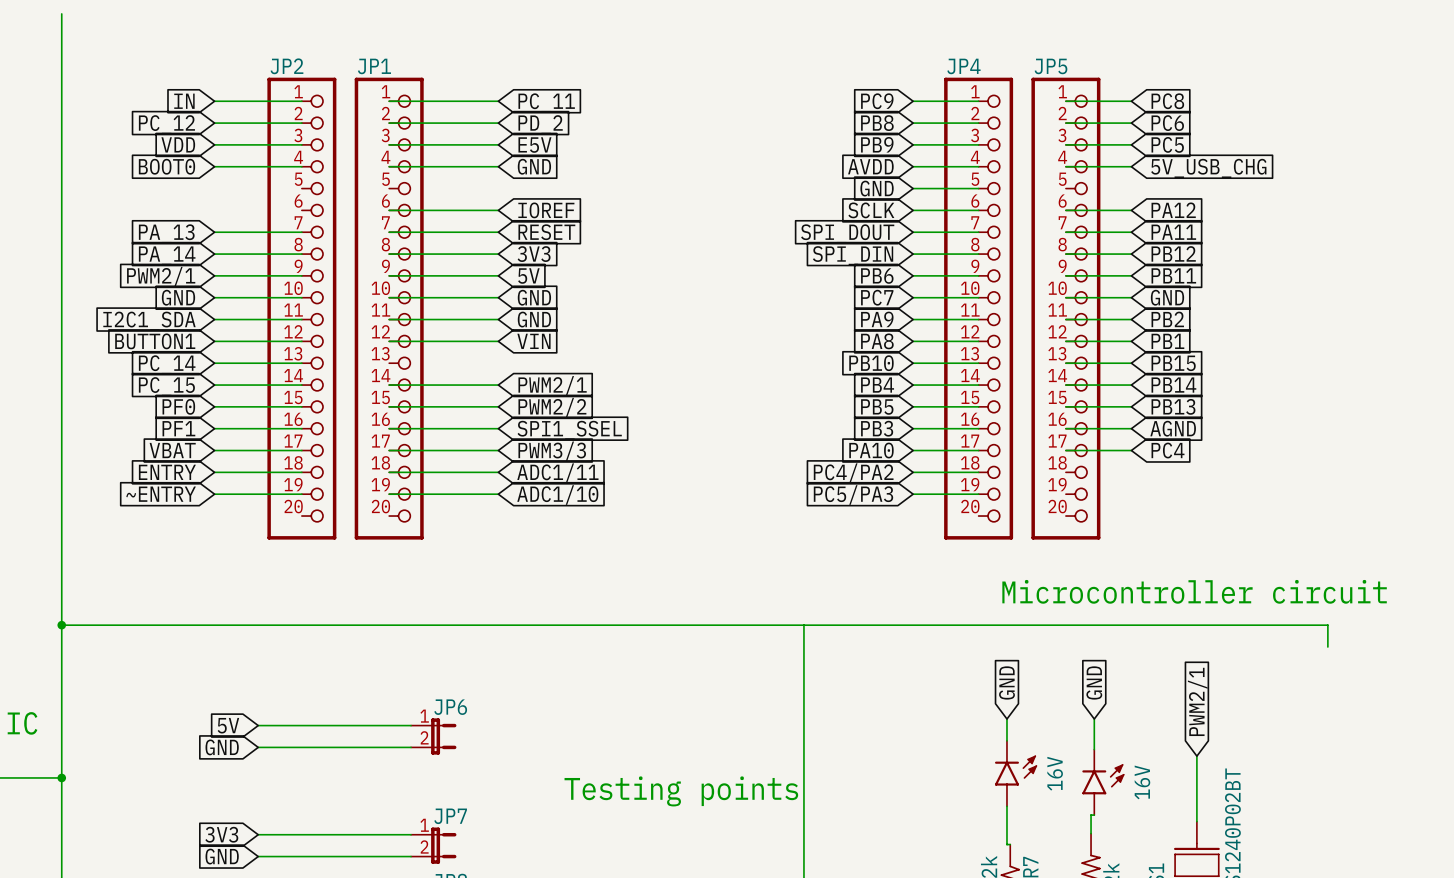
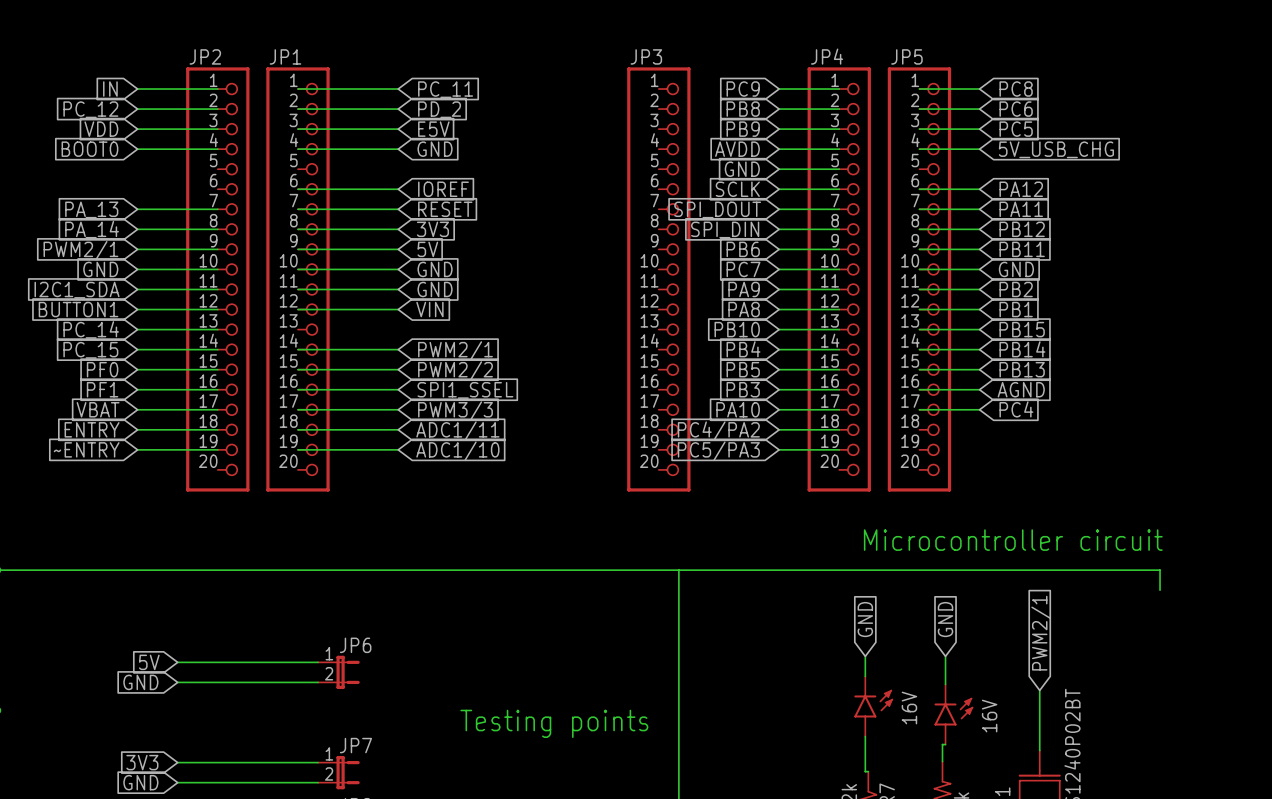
JP3: none -> (658, 279)

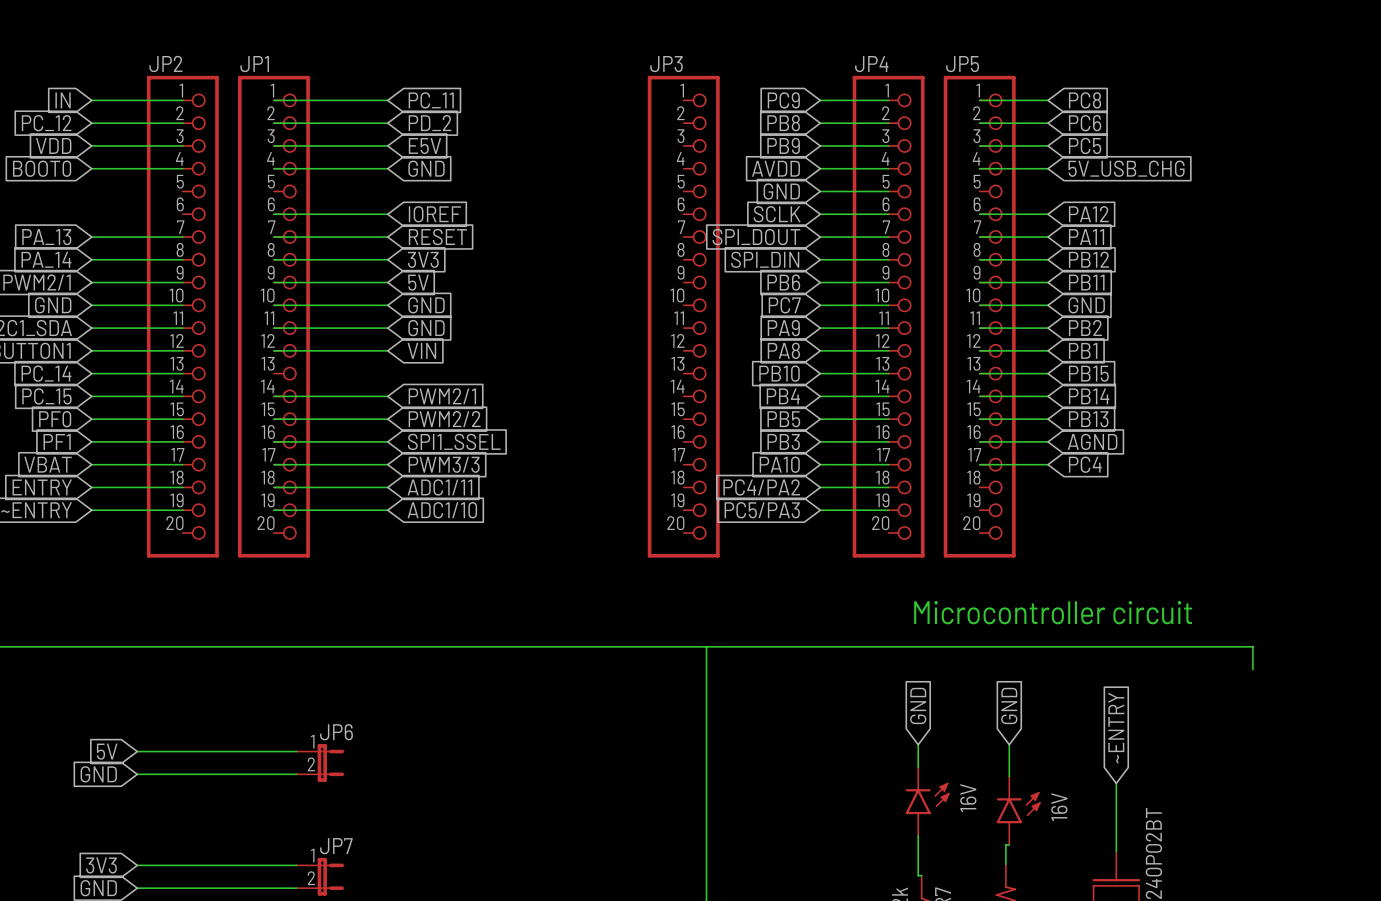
global label: PWM2/1 (1041, 633) -> ~ENTRY (1116, 728)
text: Testing points (554, 723) -> none

